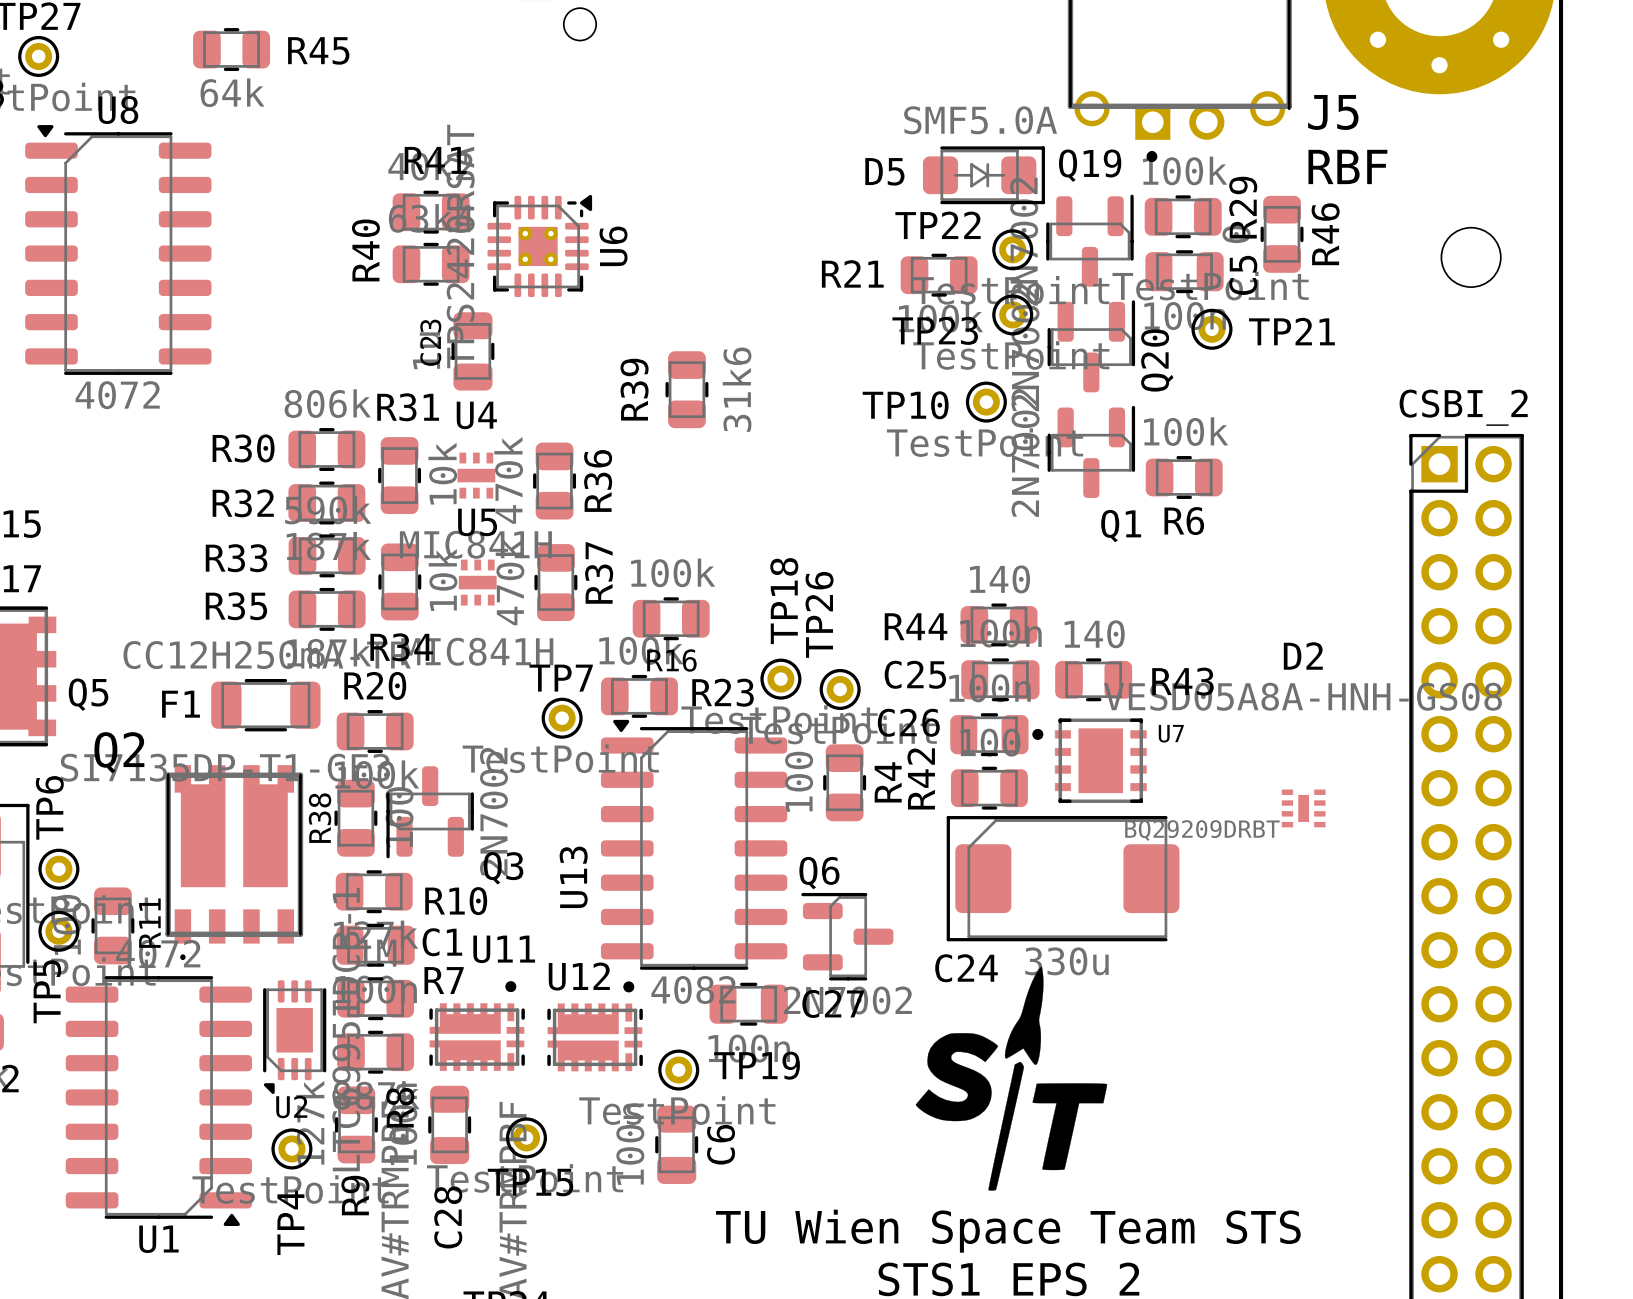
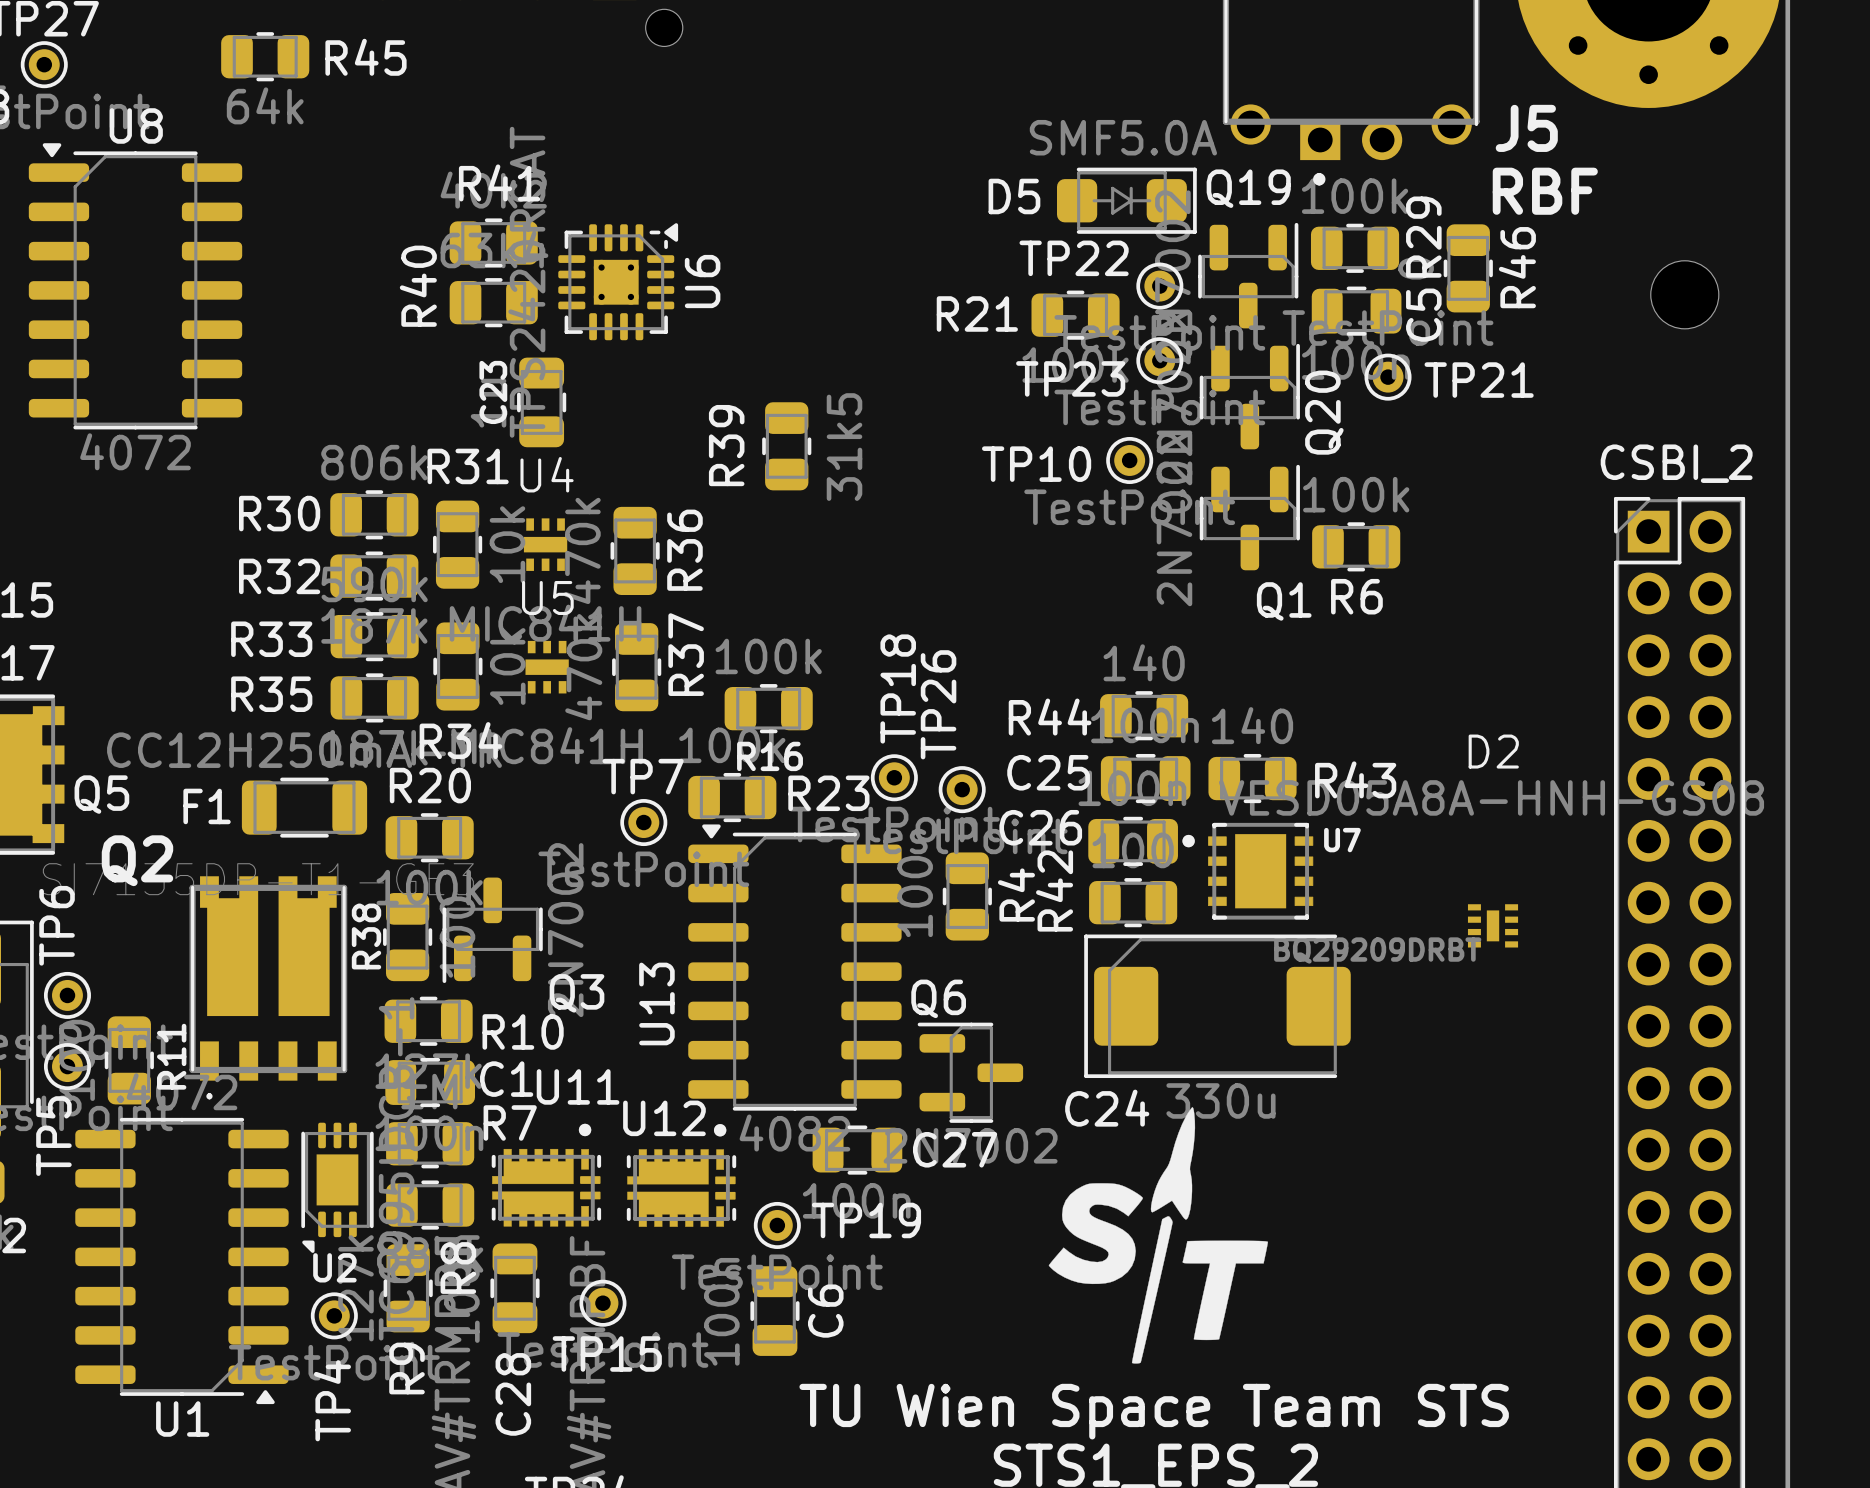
R39 value: 31k6 (737, 389) -> 31k5 (844, 447)

